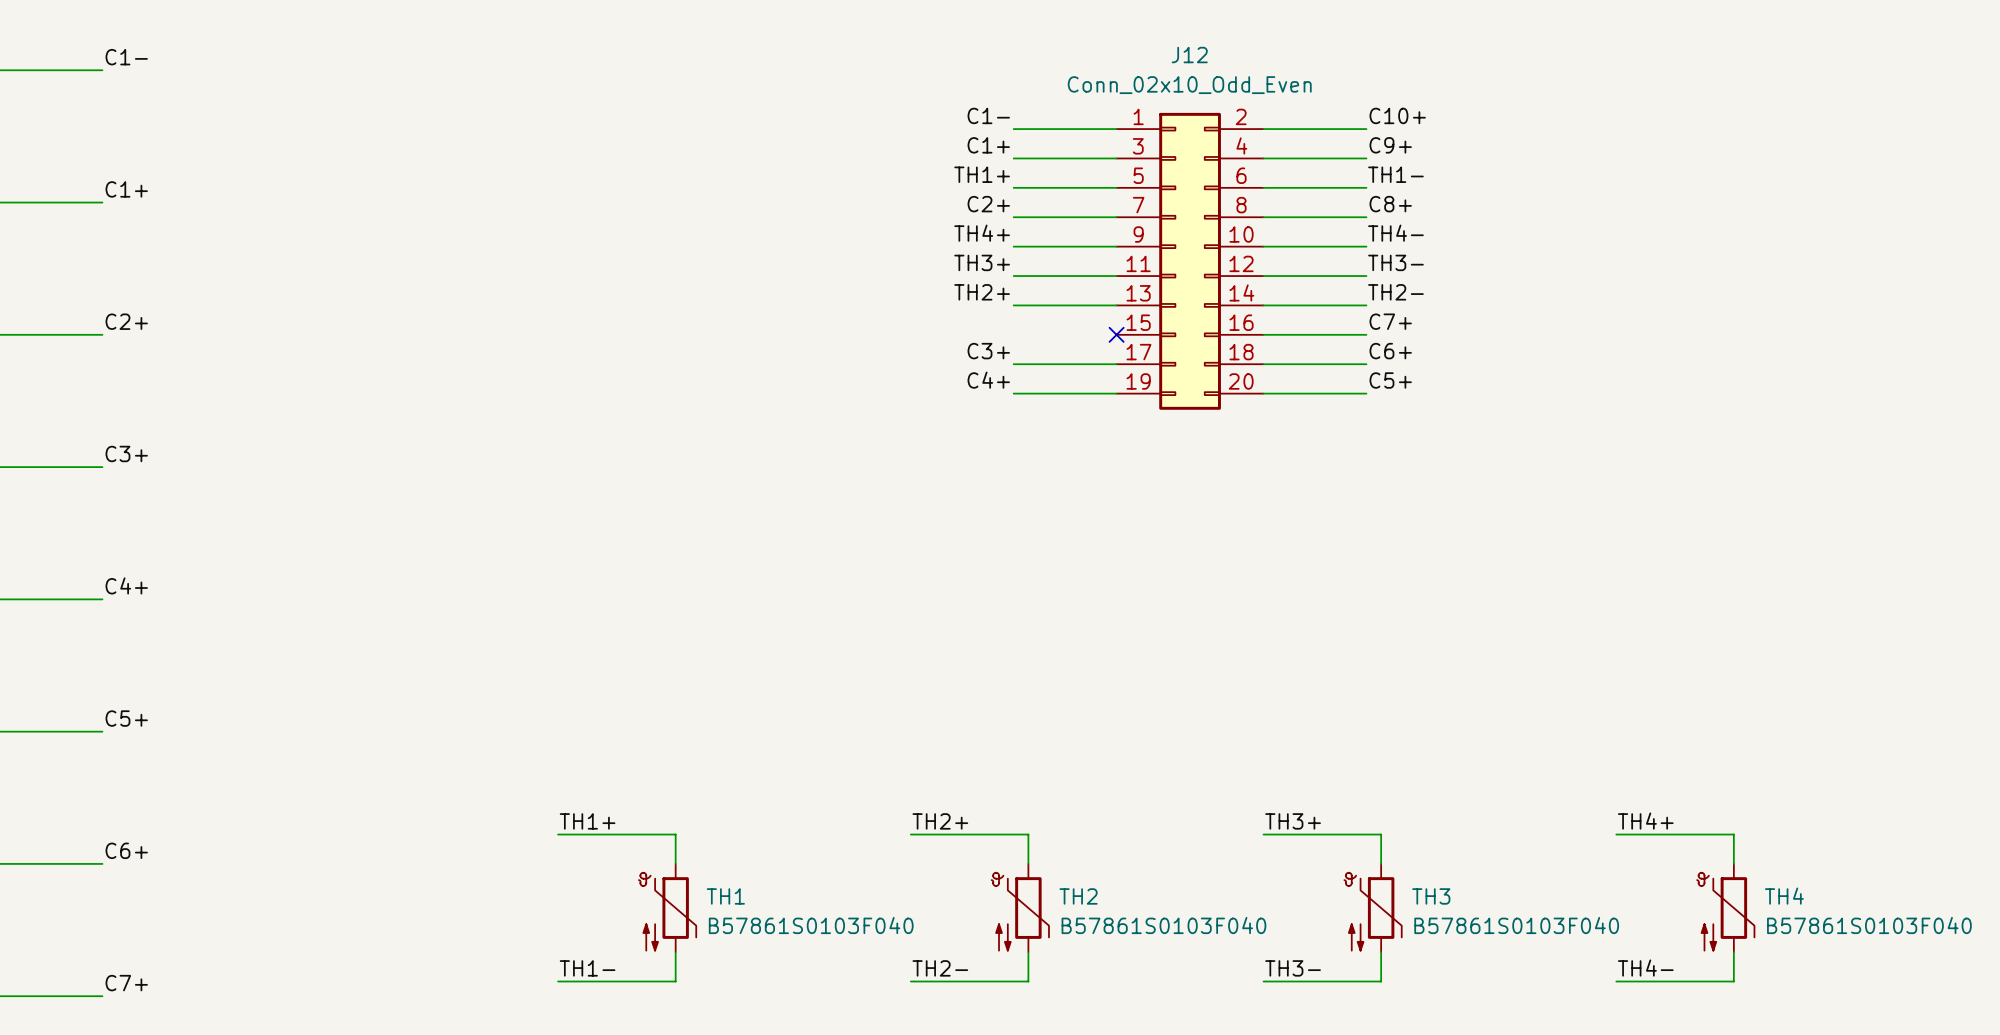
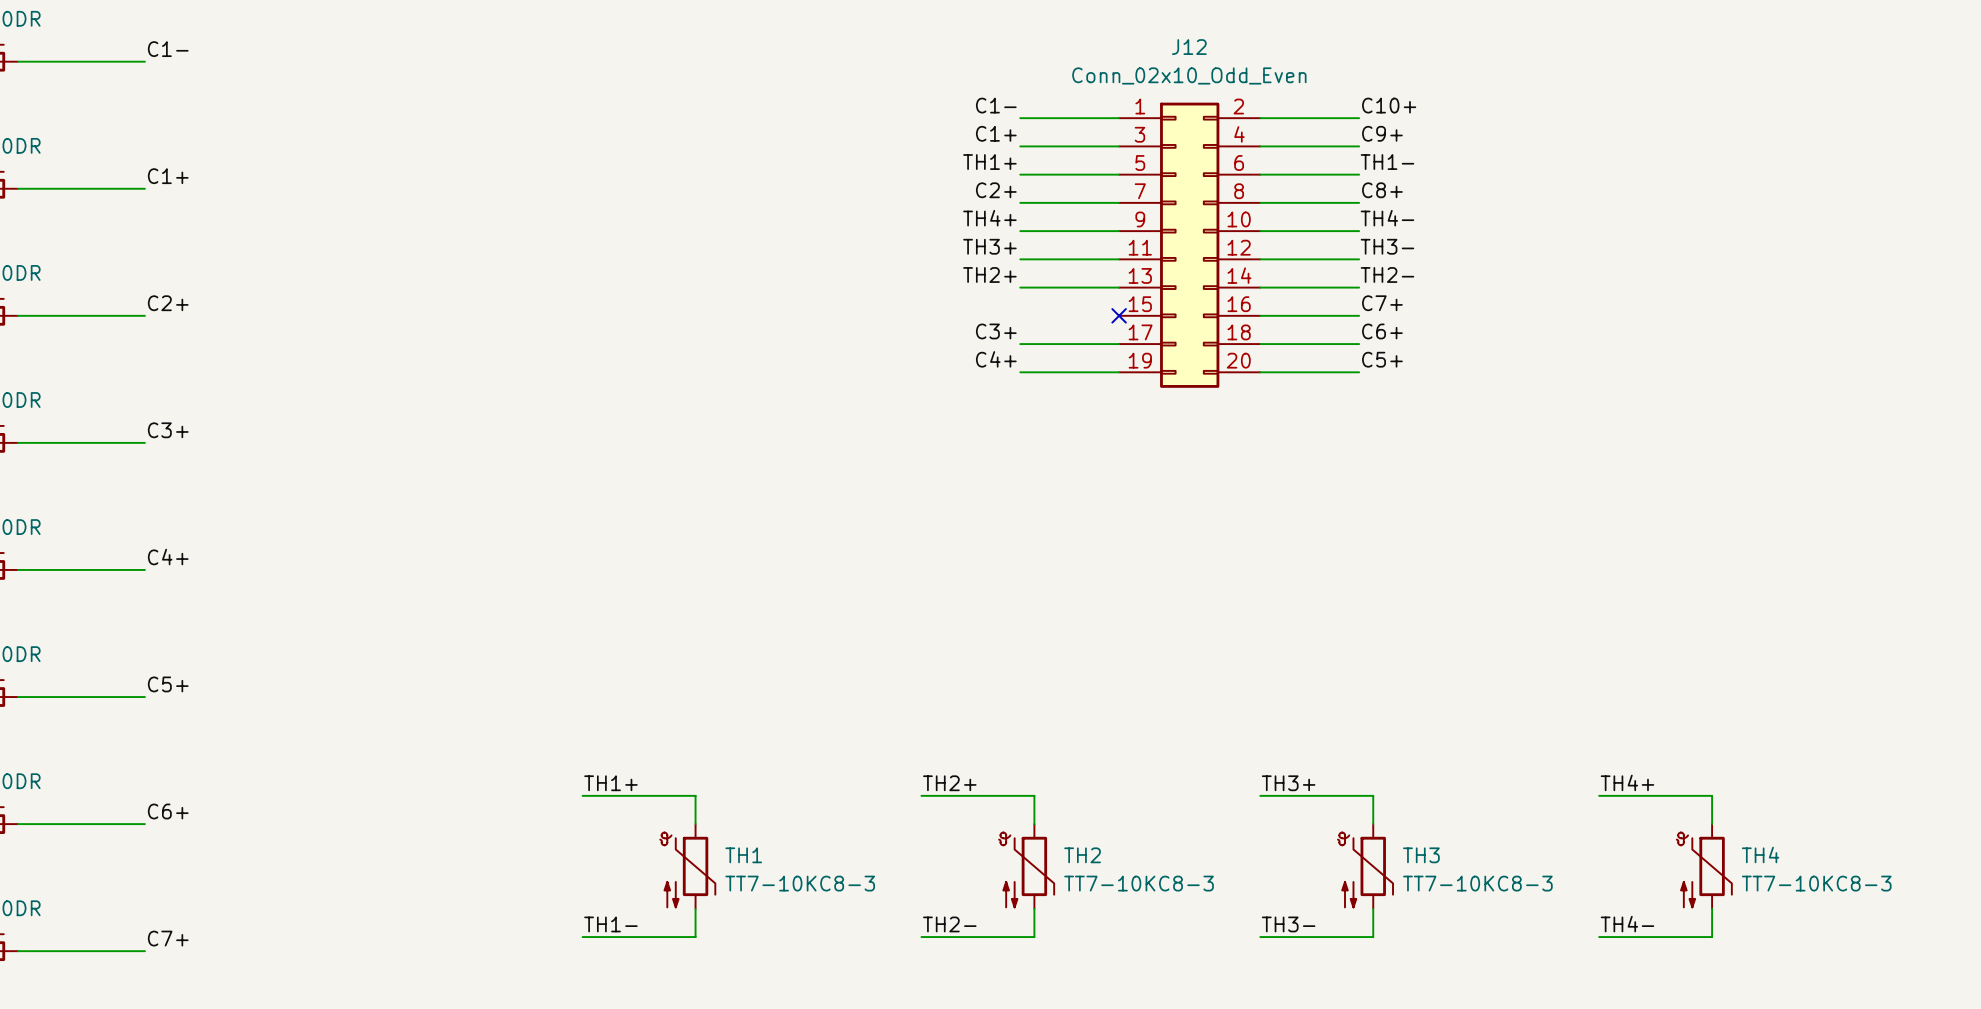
TH1 value: B57861S0103F040 (811, 925) -> TT7-10KC8-3 (800, 883)
TH2 value: B57861S0103F040 (1163, 925) -> TT7-10KC8-3 (1139, 883)
TH3 value: B57861S0103F040 (1516, 925) -> TT7-10KC8-3 (1477, 883)
TH4 value: B57861S0103F040 (1869, 925) -> TT7-10KC8-3 (1816, 883)

